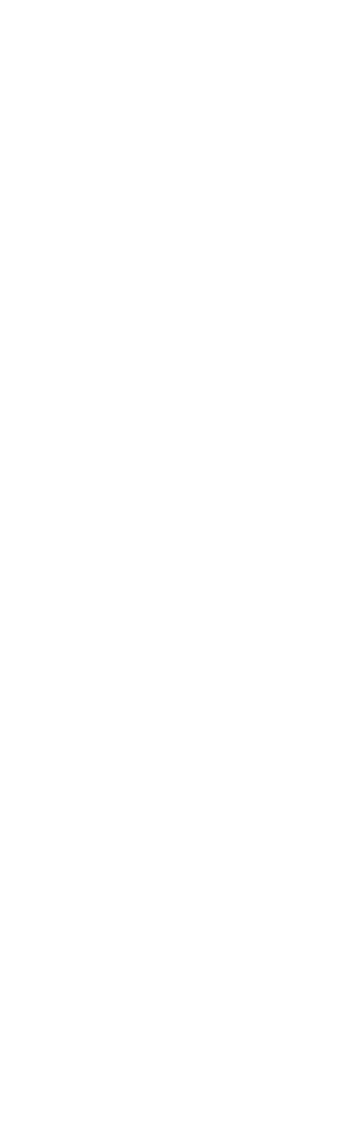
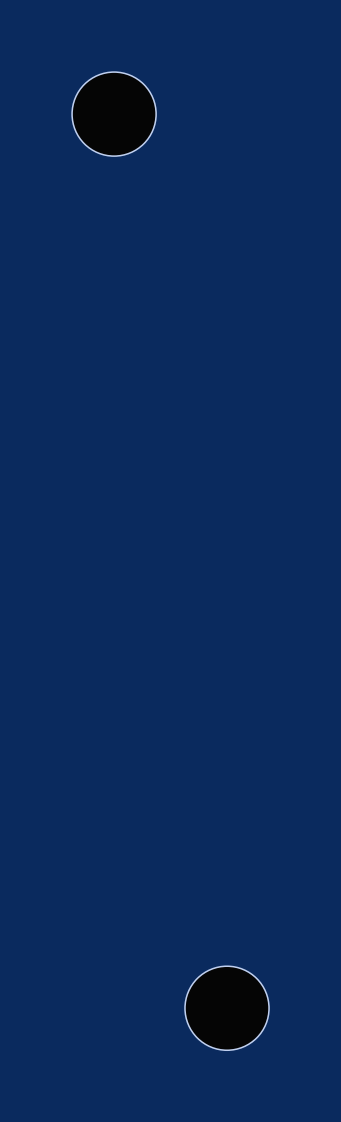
part: none -> (114, 114)
part: none -> (227, 1008)

